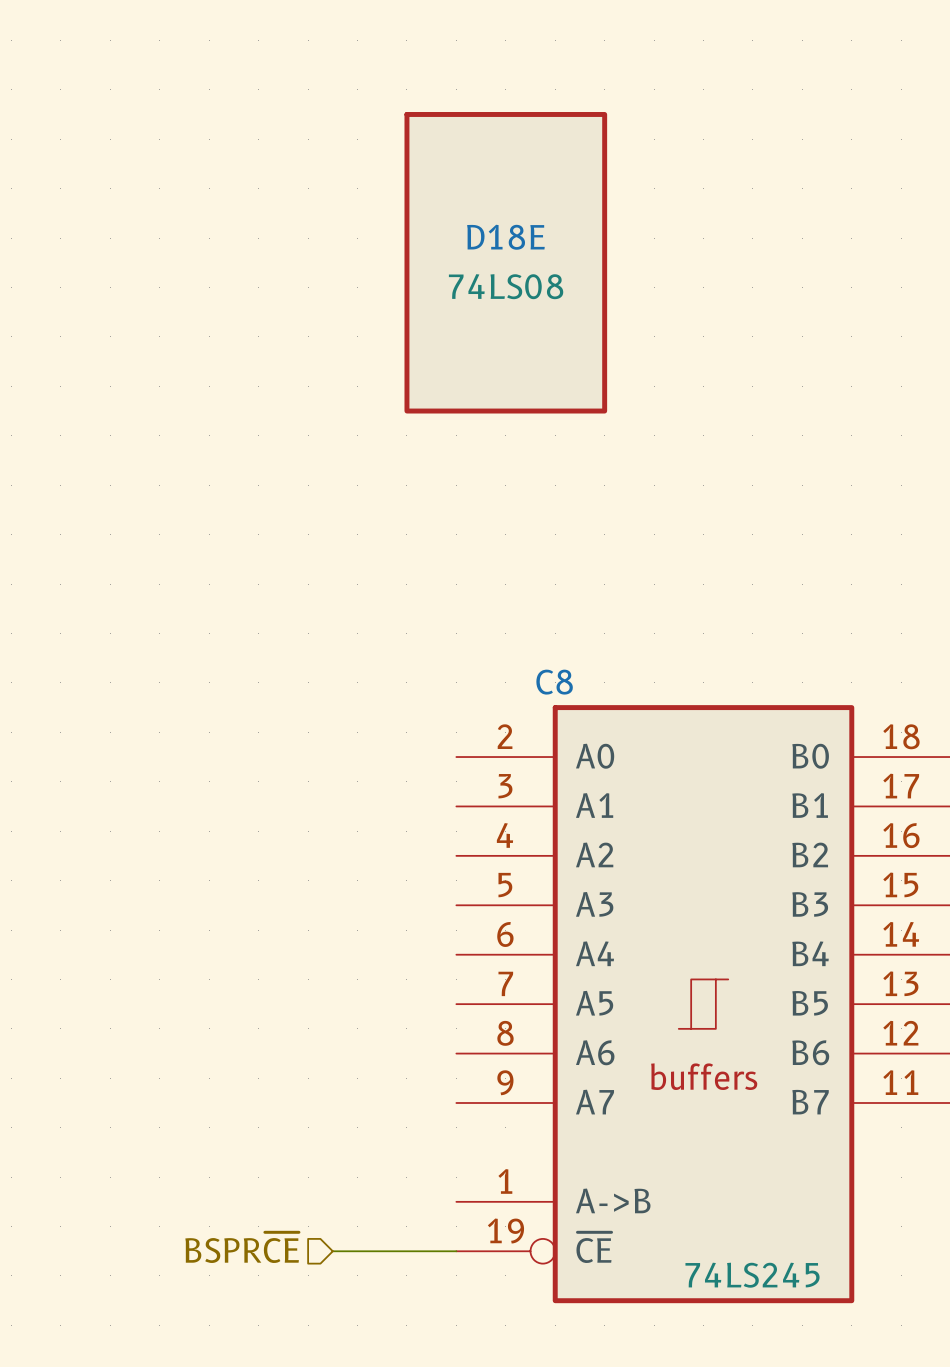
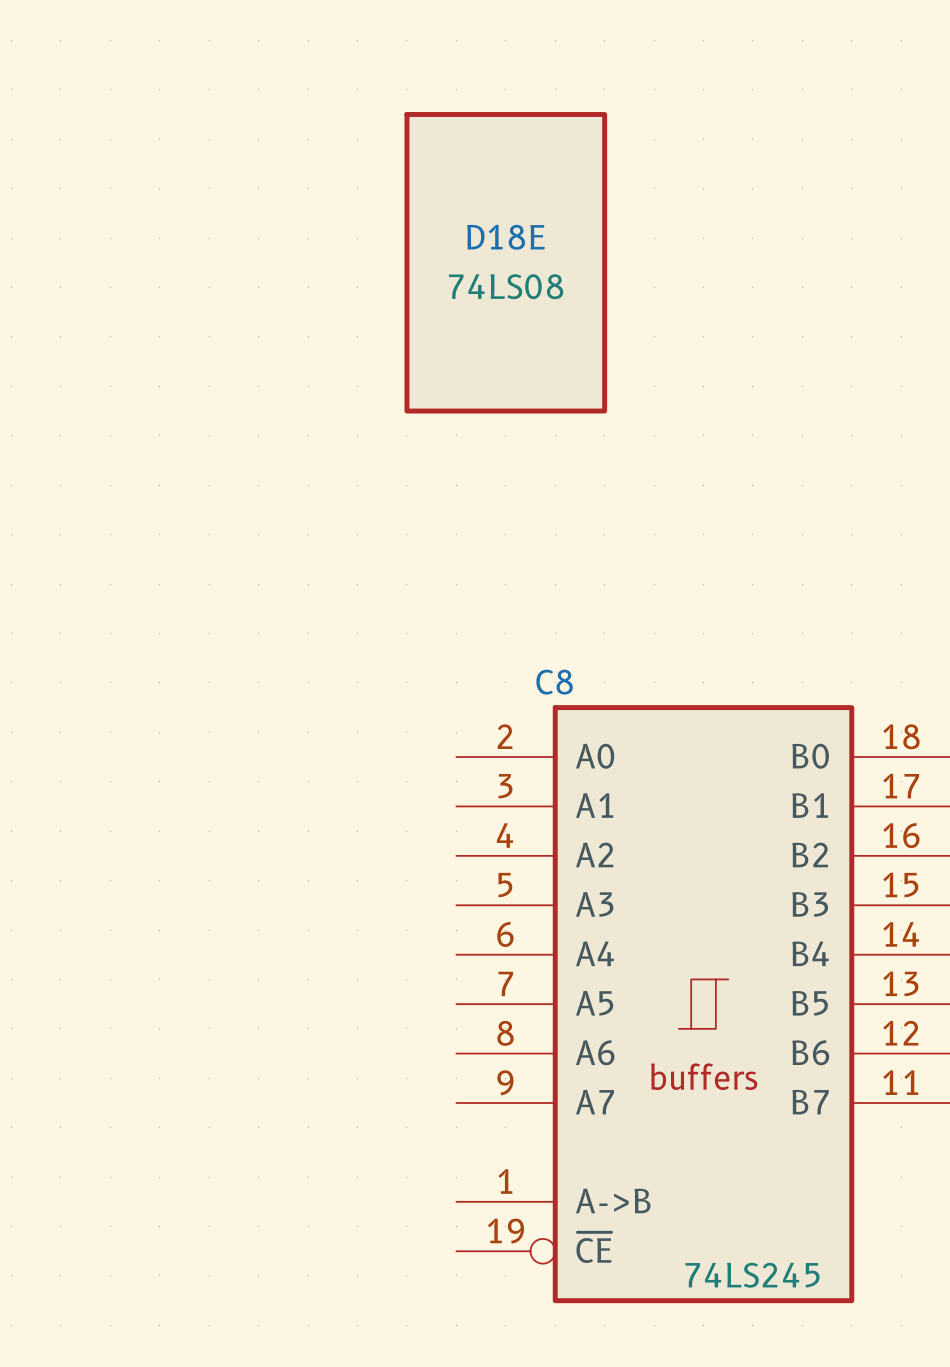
hierarchical label: BSPR~{CE} (242, 1247) -> none
wire: (332, 1251) (456, 1251) -> none

